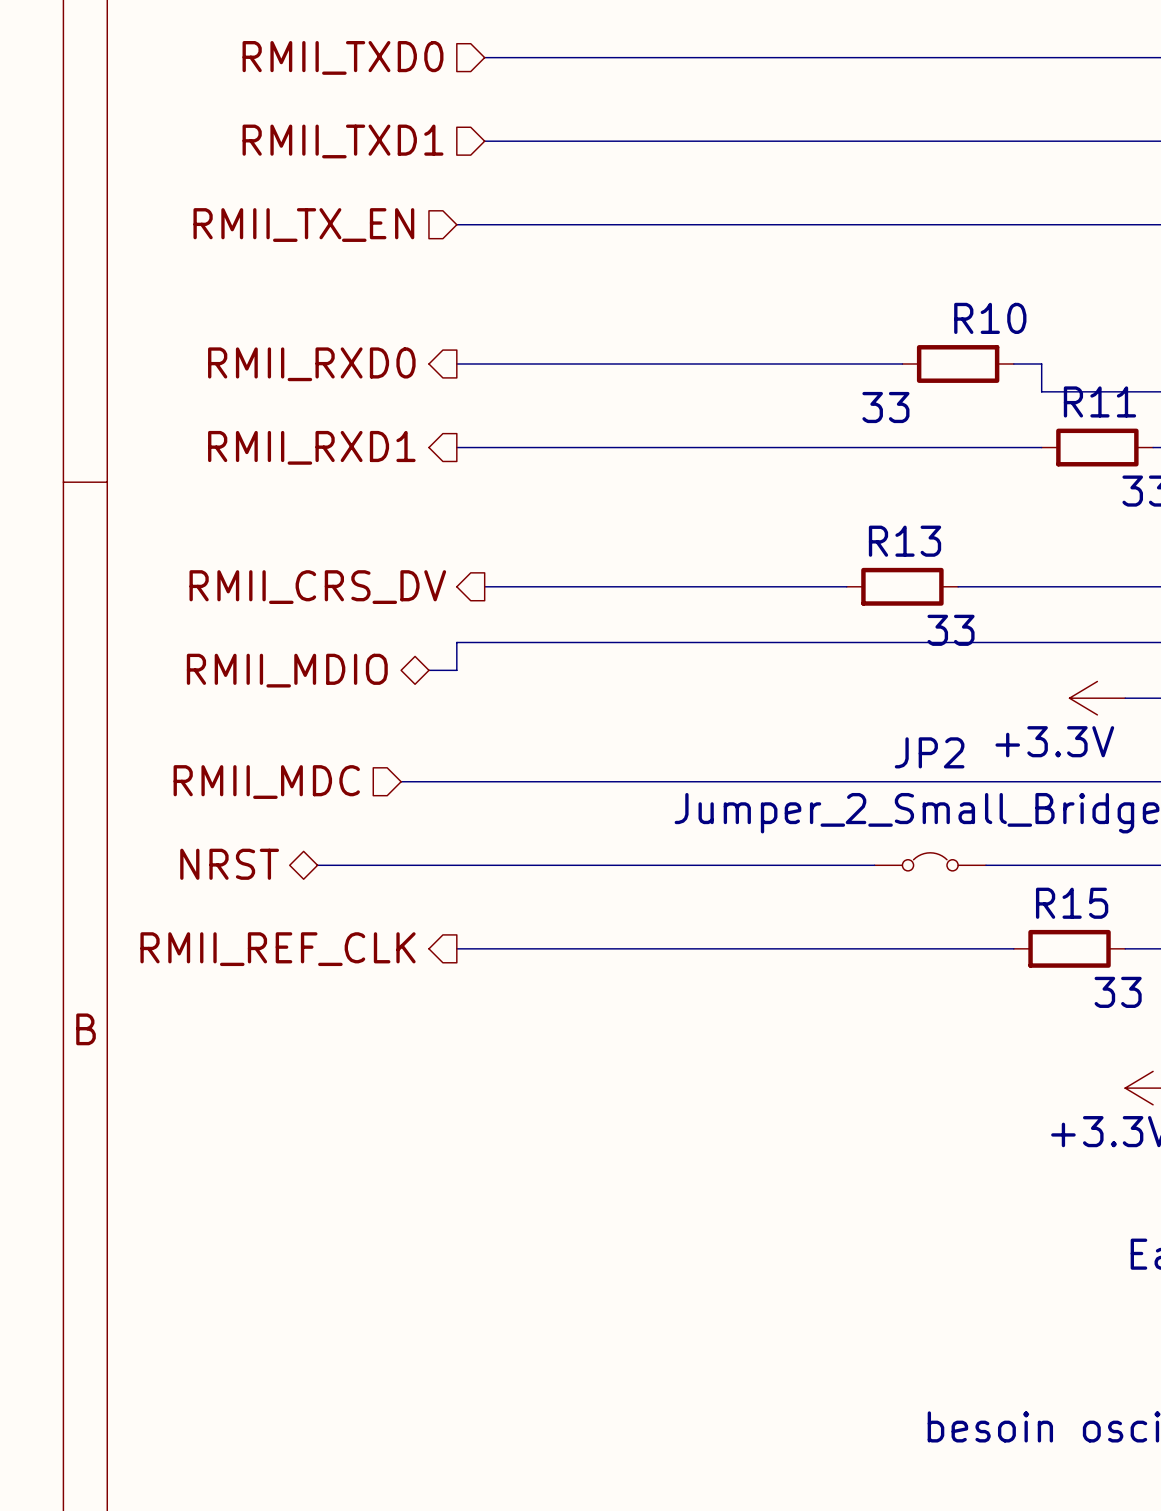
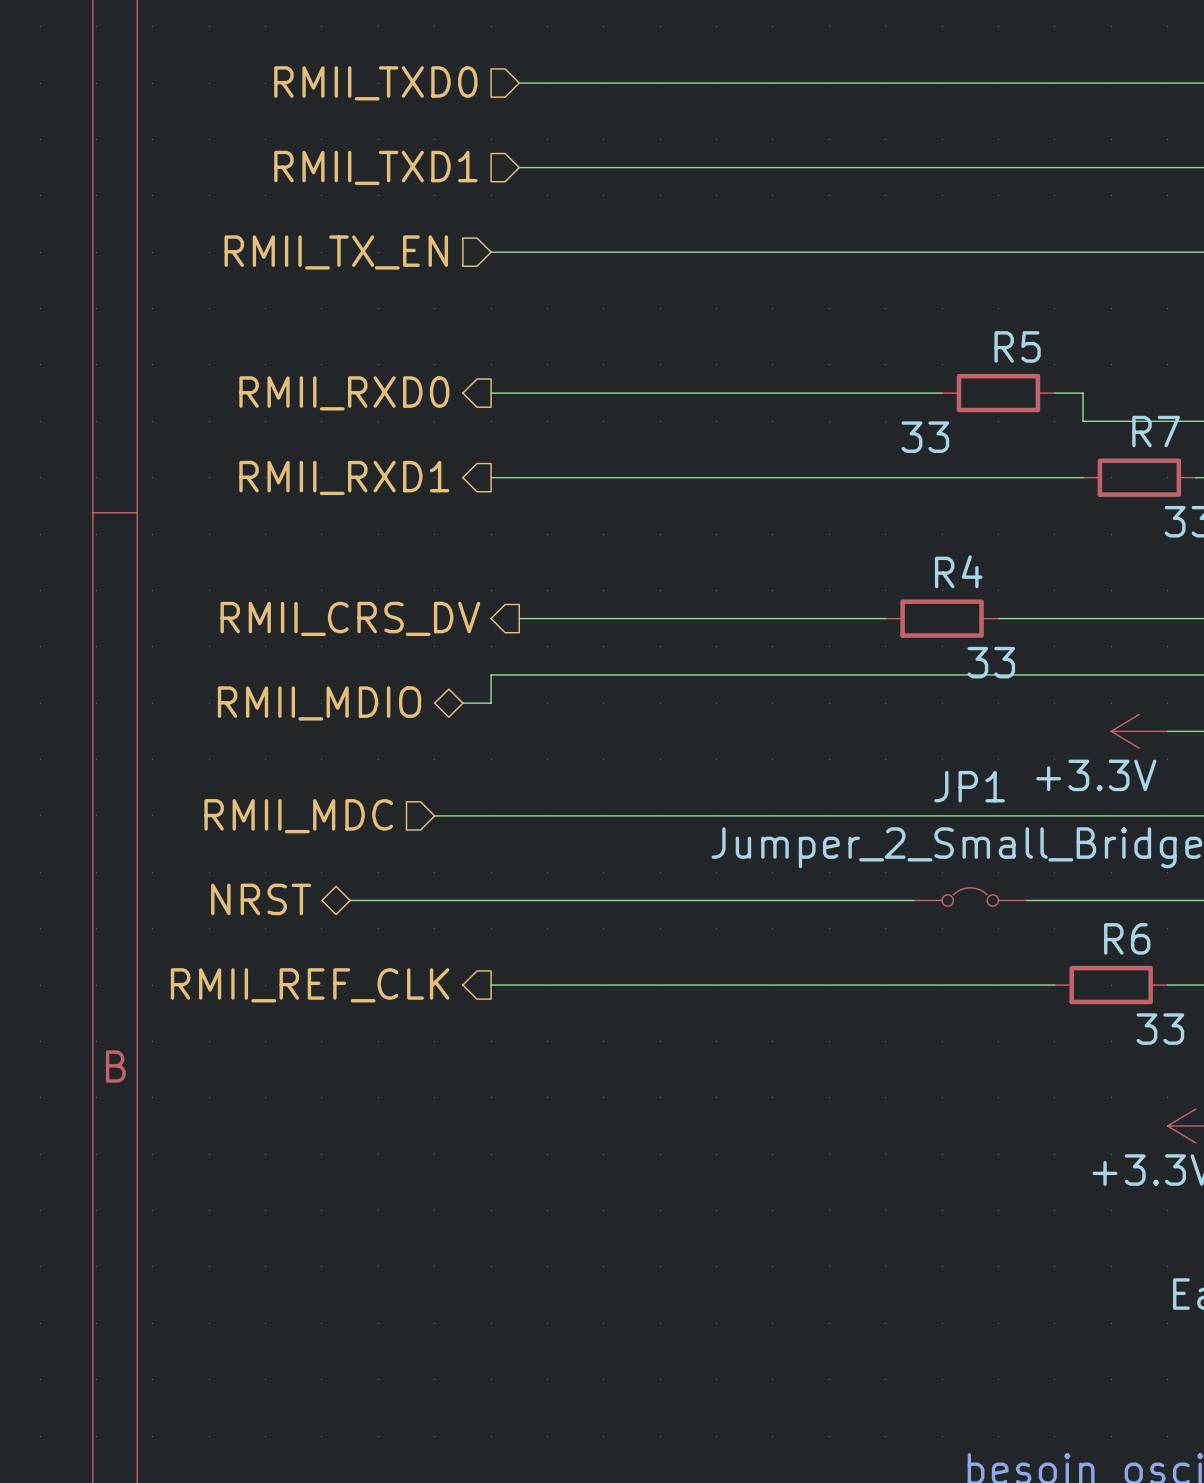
R10 name: R10 (990, 318) -> R5 (1017, 346)
R11 name: R11 (1099, 401) -> R7 (1156, 431)
R13 name: R13 (905, 541) -> R4 (958, 571)
JP2 name: JP2 (929, 752) -> JP1 (969, 786)
R15 name: R15 (1072, 903) -> R6 (1127, 938)

